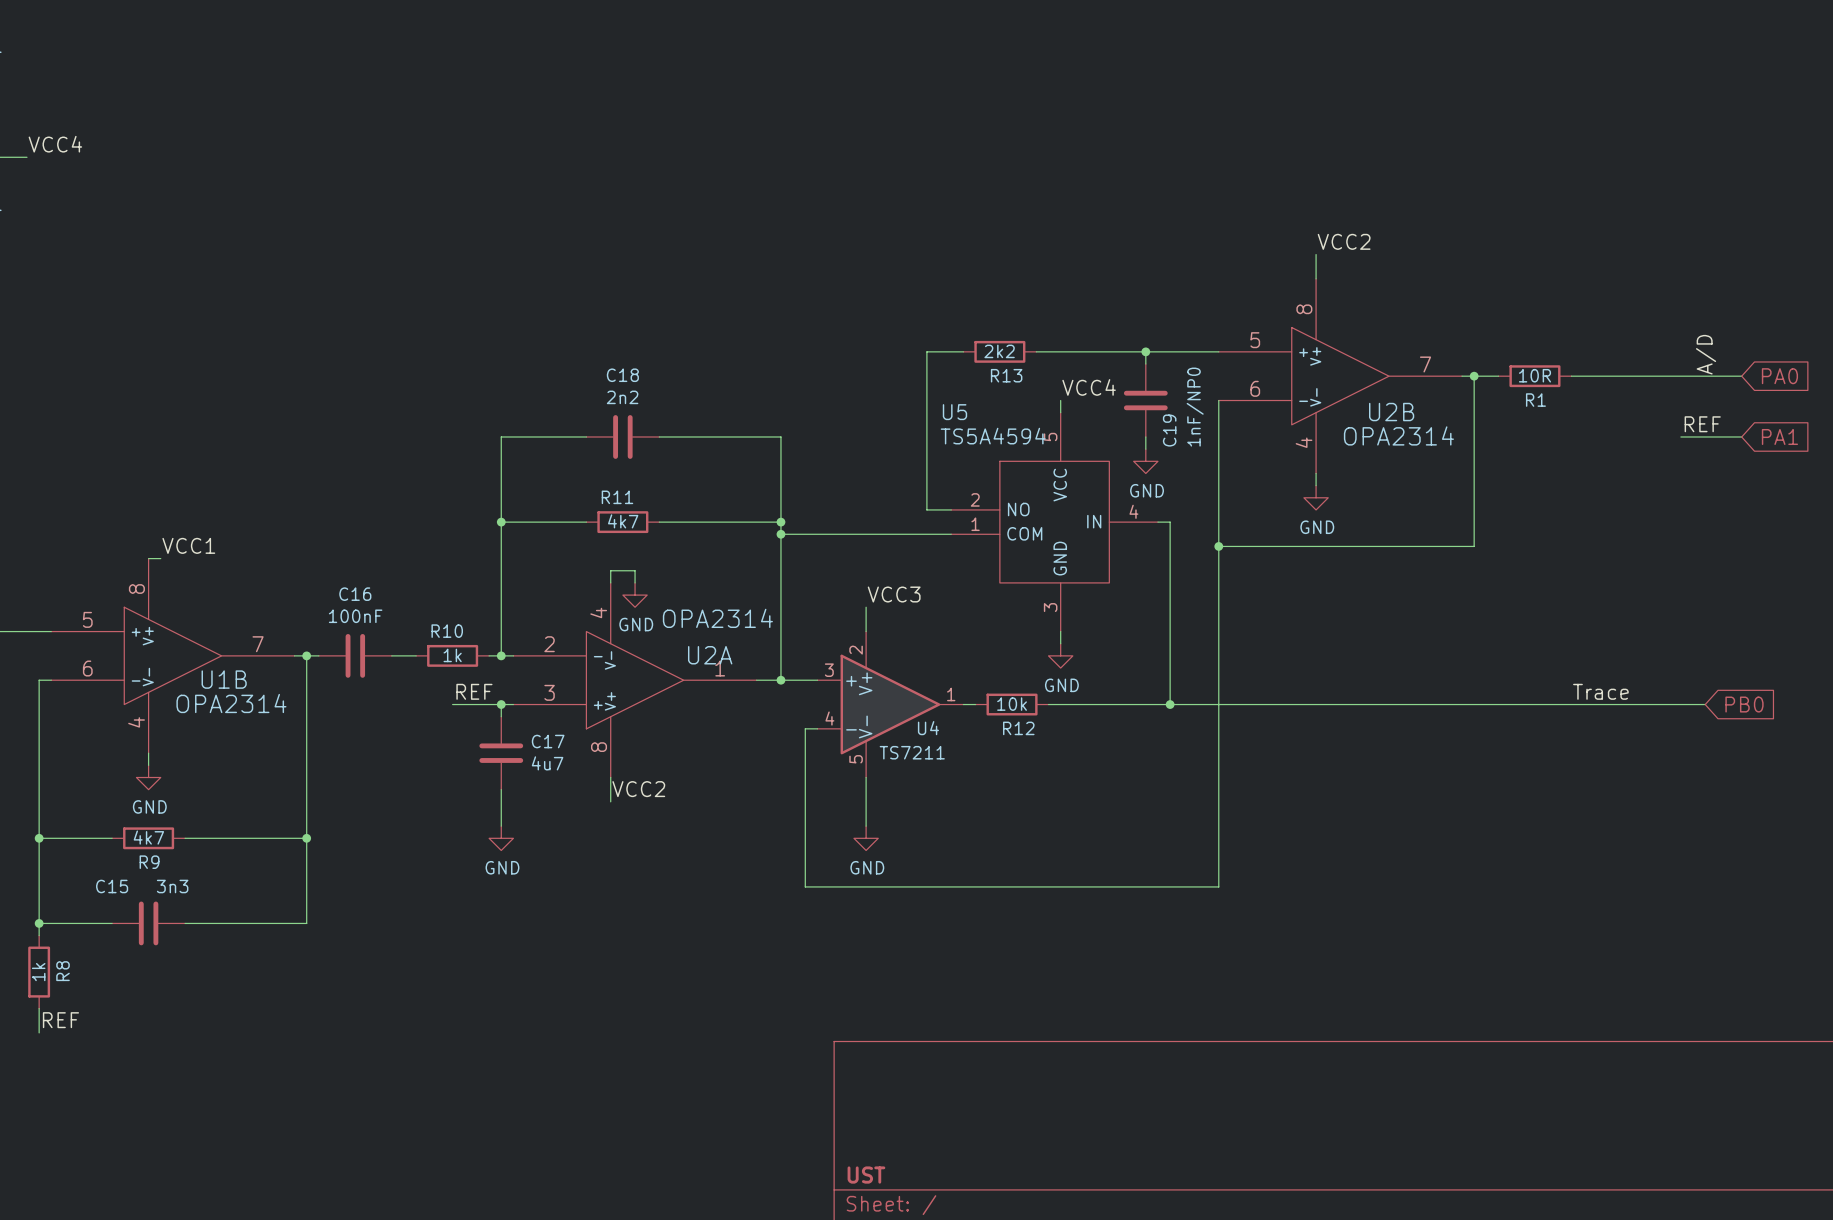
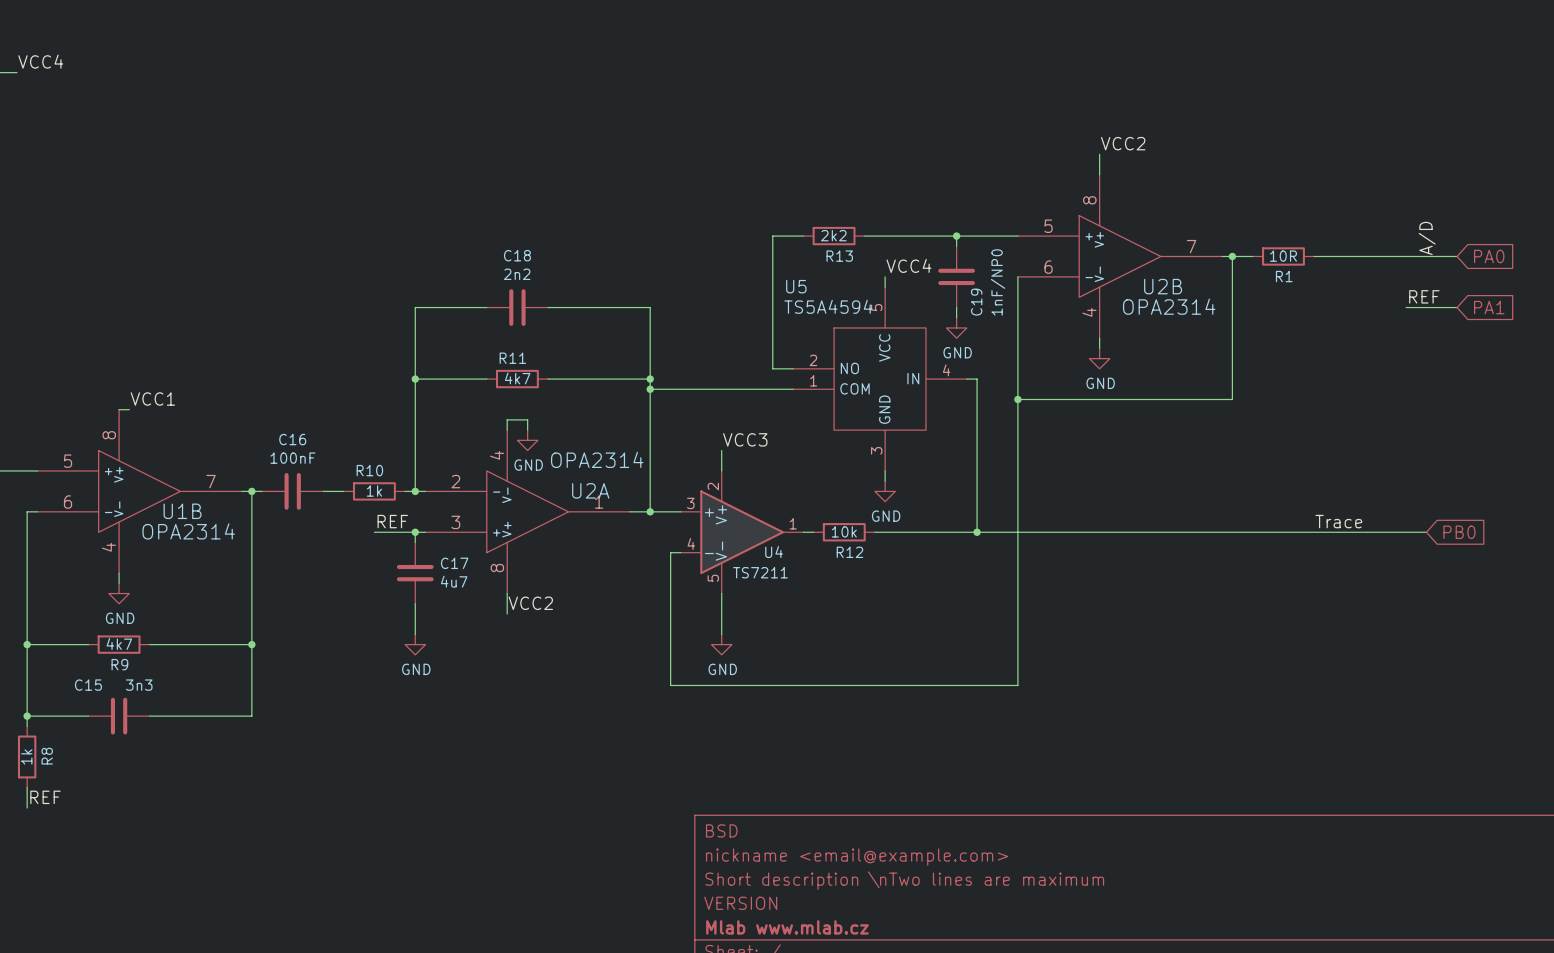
title block: none -> BSD (721, 830)
title block: none -> nickname <email@example.com> (857, 857)
title block: none -> Short description \nTwo lines are maximum (904, 880)
title block: none -> VERSION (740, 903)
title block: UST (866, 1175) -> Mlab www.mlab.cz (787, 927)

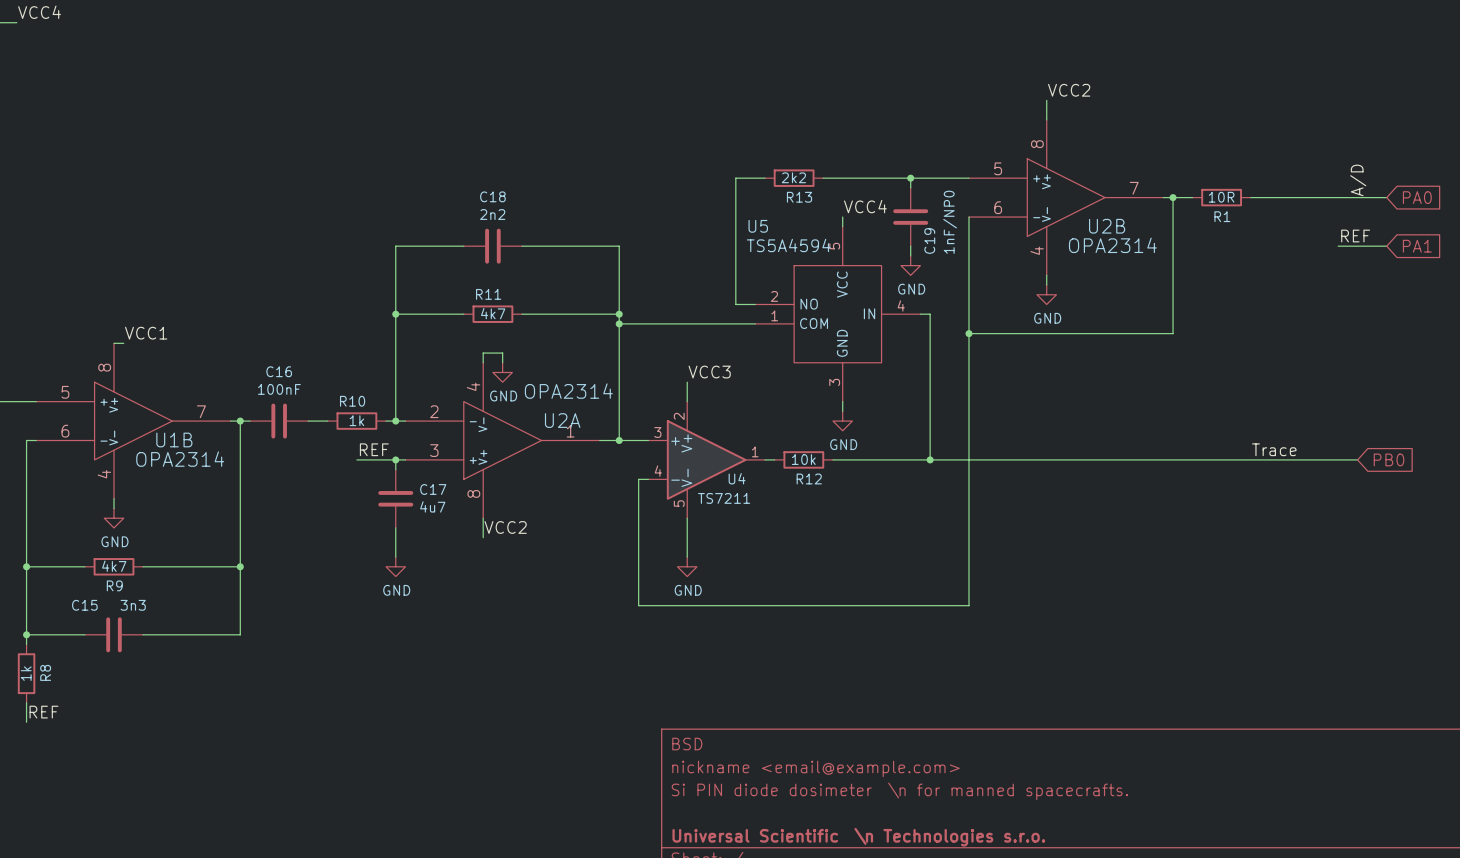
title block: Short description \nTwo lines are maximum (904, 880) -> Si PIN diode dosimeter \n for manned spacecrafts. (899, 791)
title block: VERSION (740, 903) -> none
title block: Mlab www.mlab.cz (787, 927) -> Universal Scientific \n Technologies s.r.o. (858, 837)

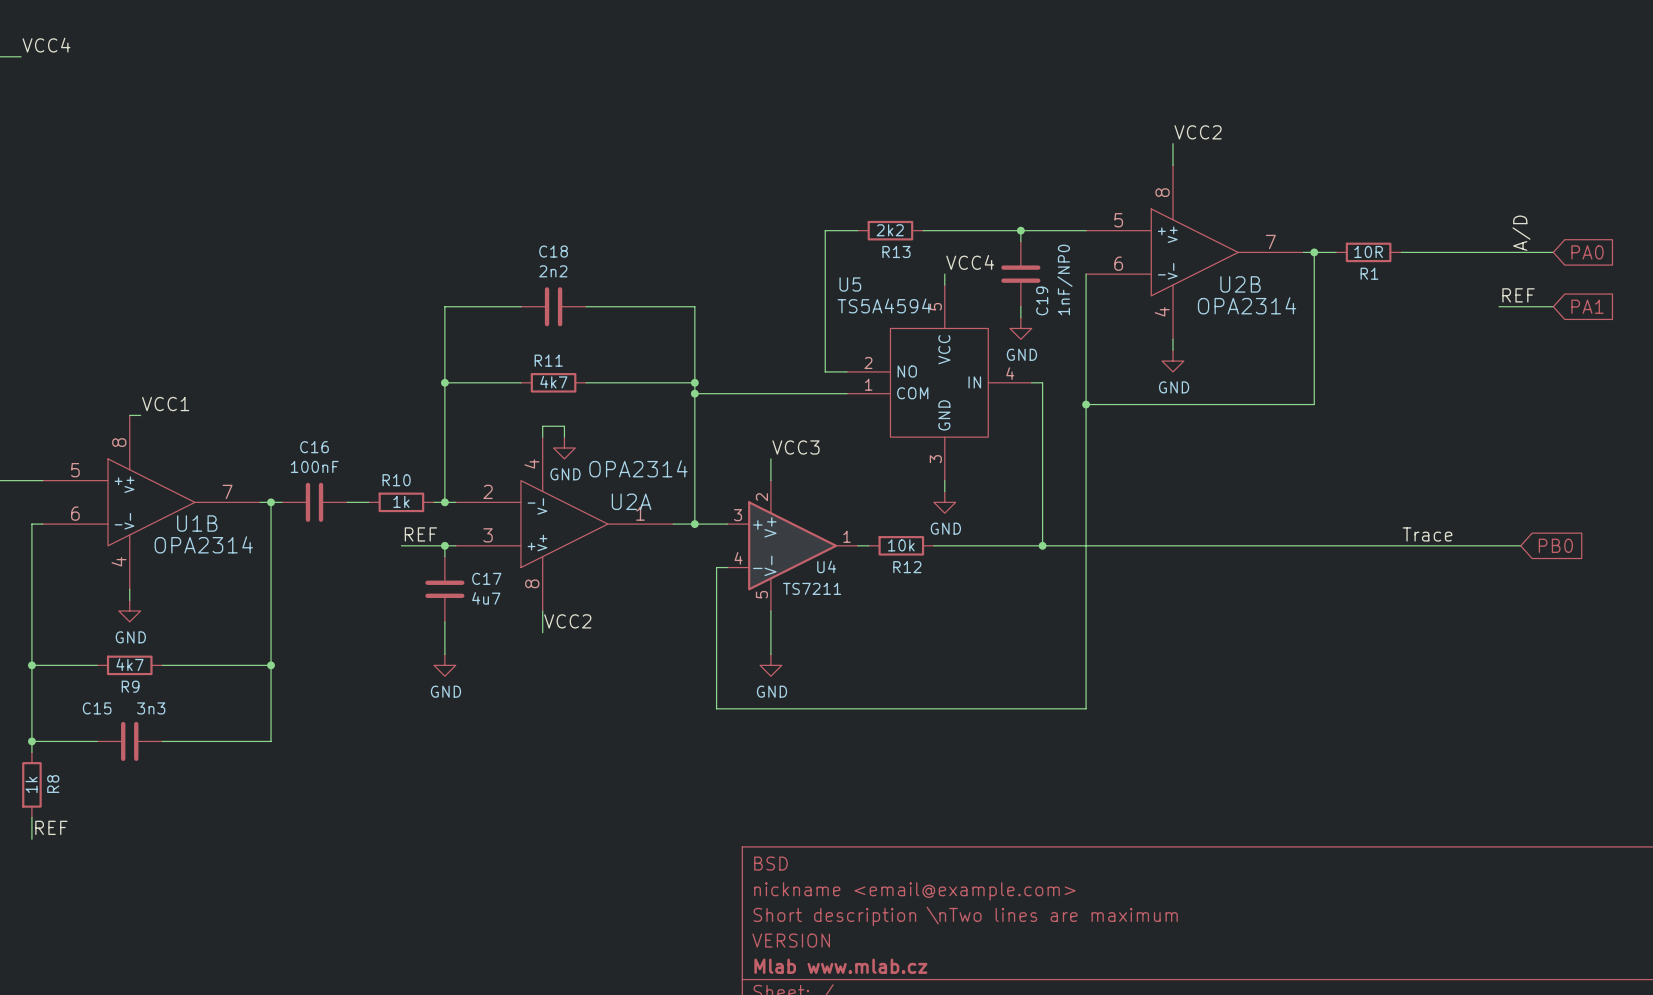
title block: Si PIN diode dosimeter \n for manned spacecrafts. (899, 791) -> Short description \nTwo lines are maximum (965, 916)
title block: none -> VERSION (791, 940)
title block: Universal Scientific \n Technologies s.r.o. (858, 837) -> Mlab www.mlab.cz (840, 966)

